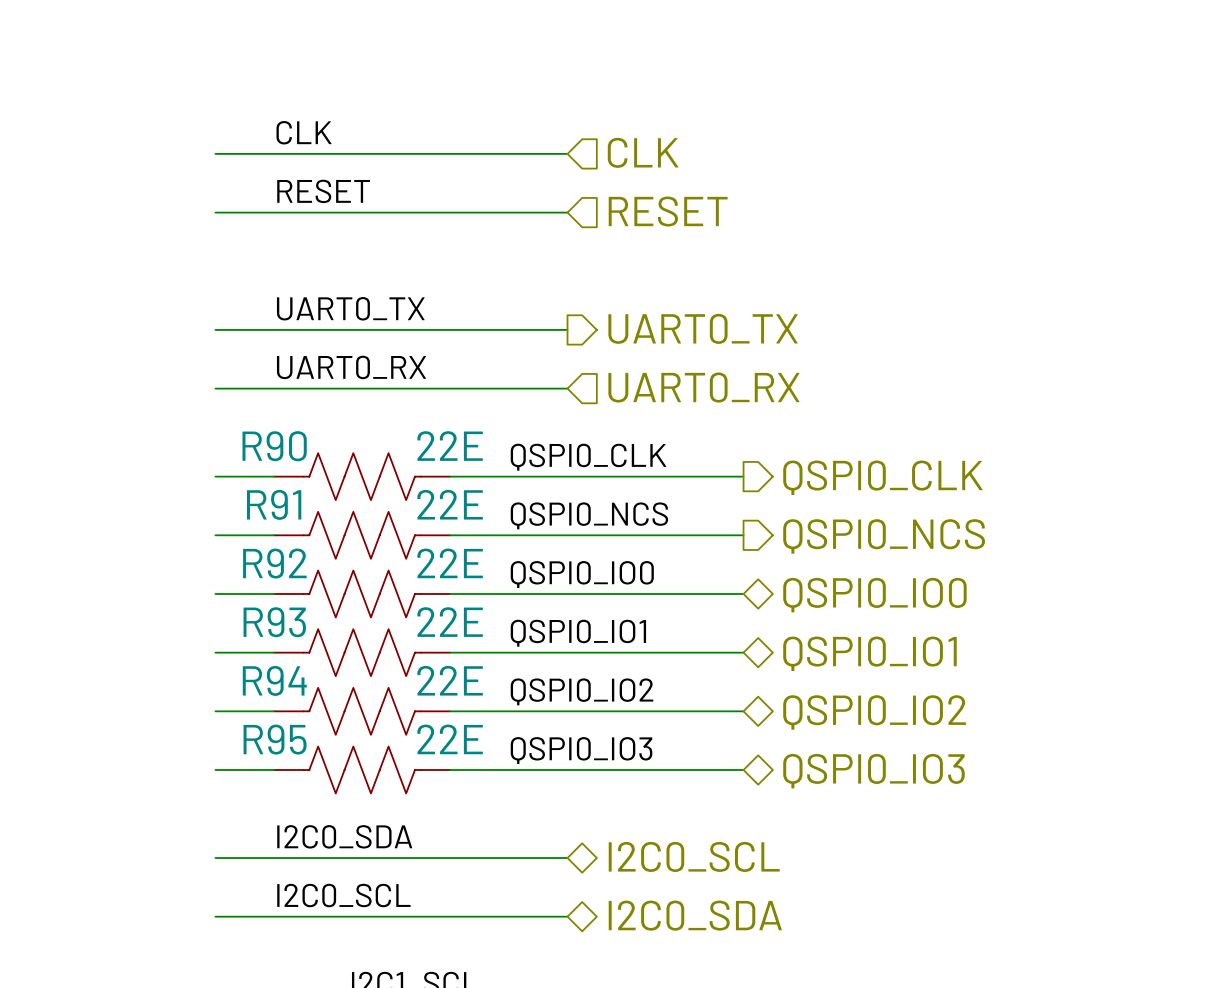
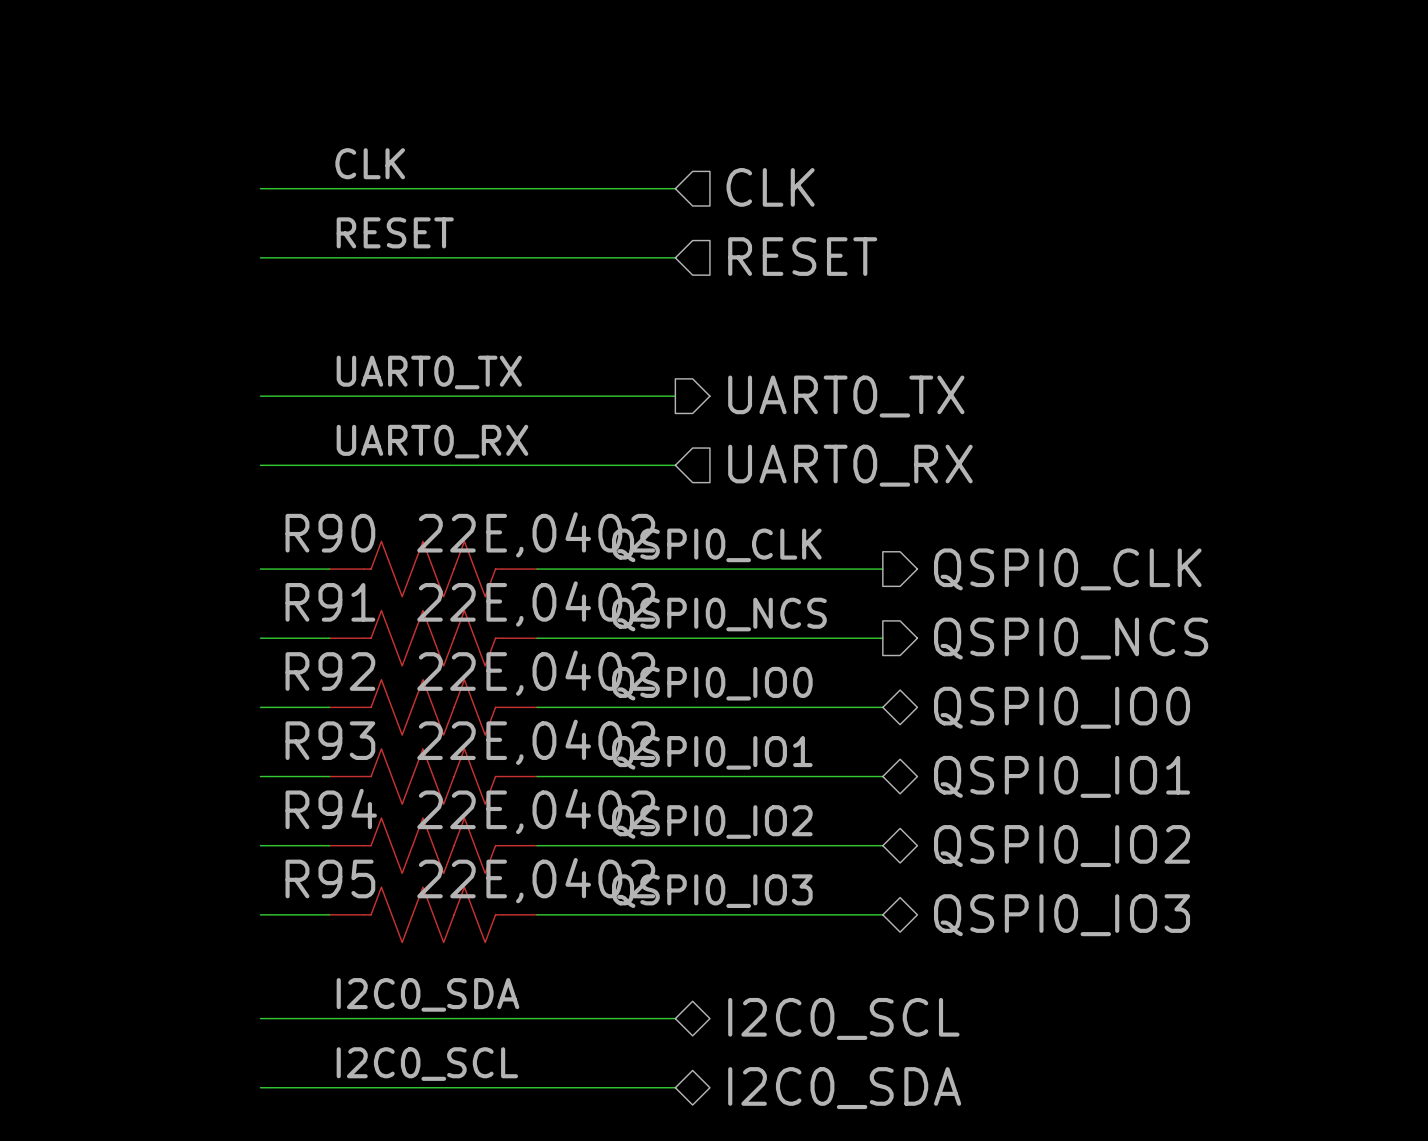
R90 value: 22E (450, 446) -> 22E,0402 (536, 534)
R91 value: 22E (450, 504) -> 22E,0402 (536, 603)
R92 value: 22E (450, 563) -> 22E,0402 (536, 673)
R93 value: 22E (450, 622) -> 22E,0402 (536, 742)
R94 value: 22E (450, 680) -> 22E,0402 (536, 811)
R95 value: 22E (450, 739) -> 22E,0402 (536, 880)

